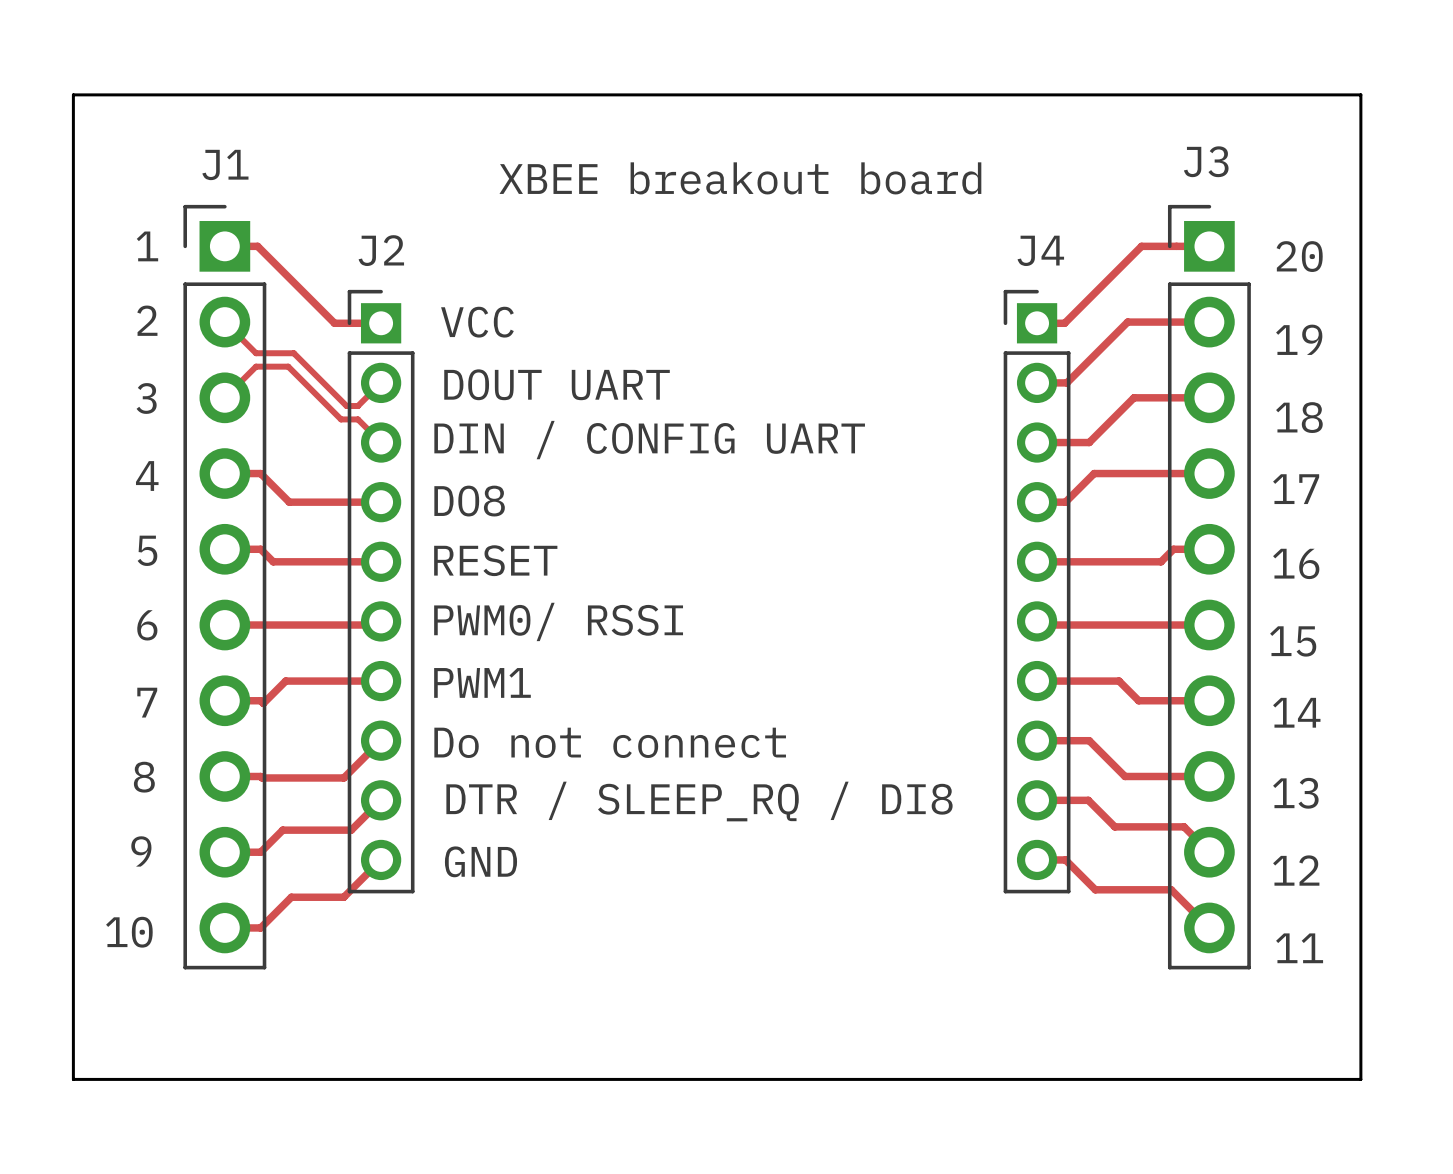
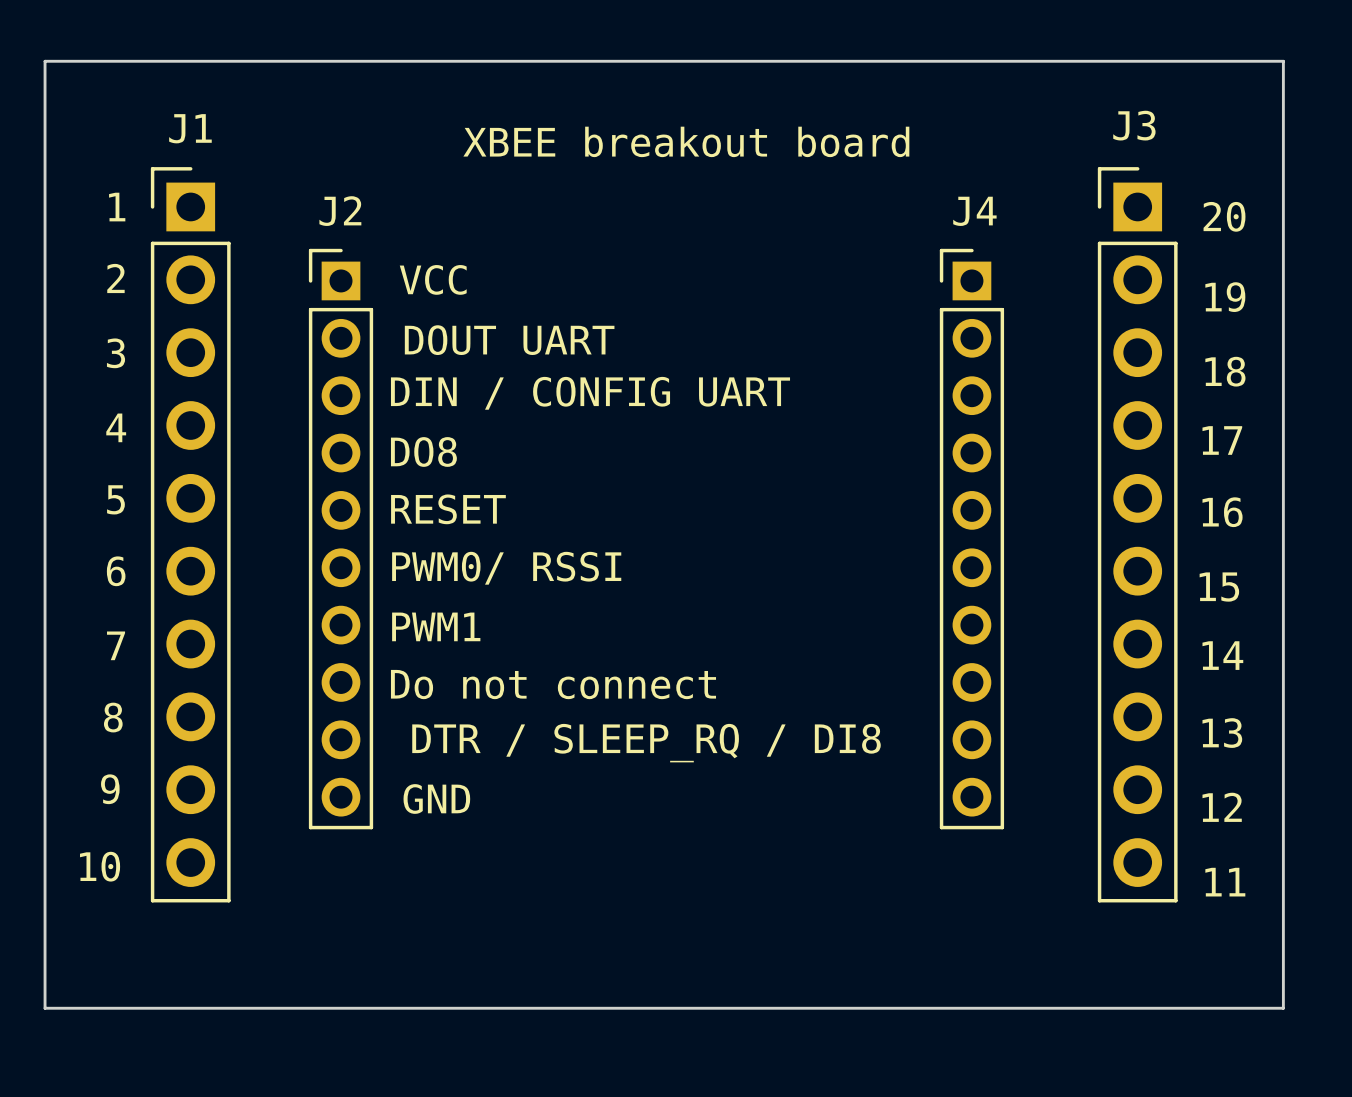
top track: (224, 246) (257, 246) (334, 323) (381, 323) -> none
top track: (1209, 246) (1141, 246) (1064, 323) (1037, 323) -> none
top track: (224, 322) (256, 353) (293, 353) (346, 406) (357, 406) (381, 382) -> none
top track: (1209, 322) (1127, 322) (1066, 382) (1037, 382) -> none
top track: (224, 397) (256, 366) (288, 366) (341, 419) (357, 419) (381, 442) -> none
top track: (1209, 397) (1133, 397) (1089, 442) (1037, 442) -> none
top track: (224, 473) (260, 473) (289, 502) (381, 502) -> none
top track: (1209, 473) (1094, 473) (1065, 502) (1037, 502) -> none
top track: (224, 549) (260, 549) (273, 561) (381, 561) -> none
top track: (1209, 549) (1173, 549) (1161, 561) (1037, 561) -> none
top track: (381, 621) (377, 625) (224, 625) -> none
top track: (1037, 621) (1040, 625) (1209, 625) -> none
top track: (381, 681) (285, 681) (263, 703) (260, 700) (224, 700) -> none
top track: (1037, 681) (1119, 681) (1138, 700) (1209, 700) -> none
top track: (381, 740) (343, 777) (224, 776) -> none
top track: (1037, 740) (1089, 740) (1125, 776) (1209, 776) -> none
top track: (381, 800) (351, 830) (282, 830) (260, 852) (224, 852) -> none
top track: (1037, 800) (1088, 800) (1114, 826) (1184, 826) (1209, 852) -> none
top track: (381, 859) (343, 897) (291, 897) (260, 927) (224, 927) -> none
top track: (1037, 859) (1065, 859) (1095, 889) (1171, 889) (1209, 927) -> none

